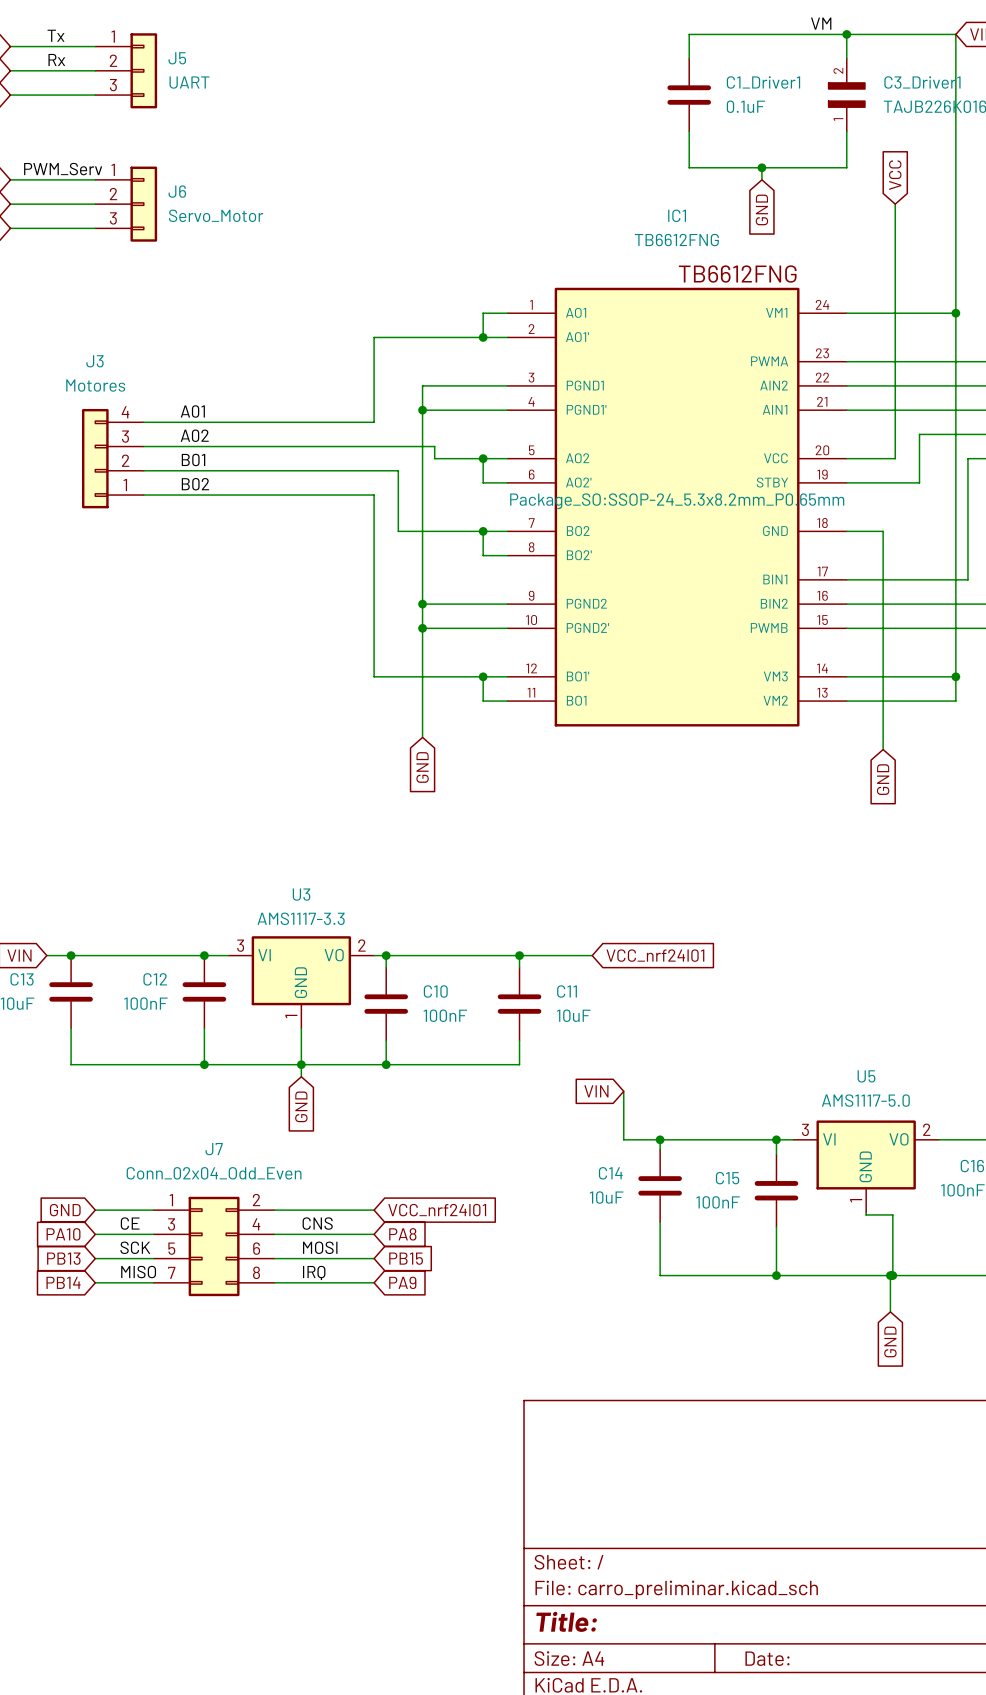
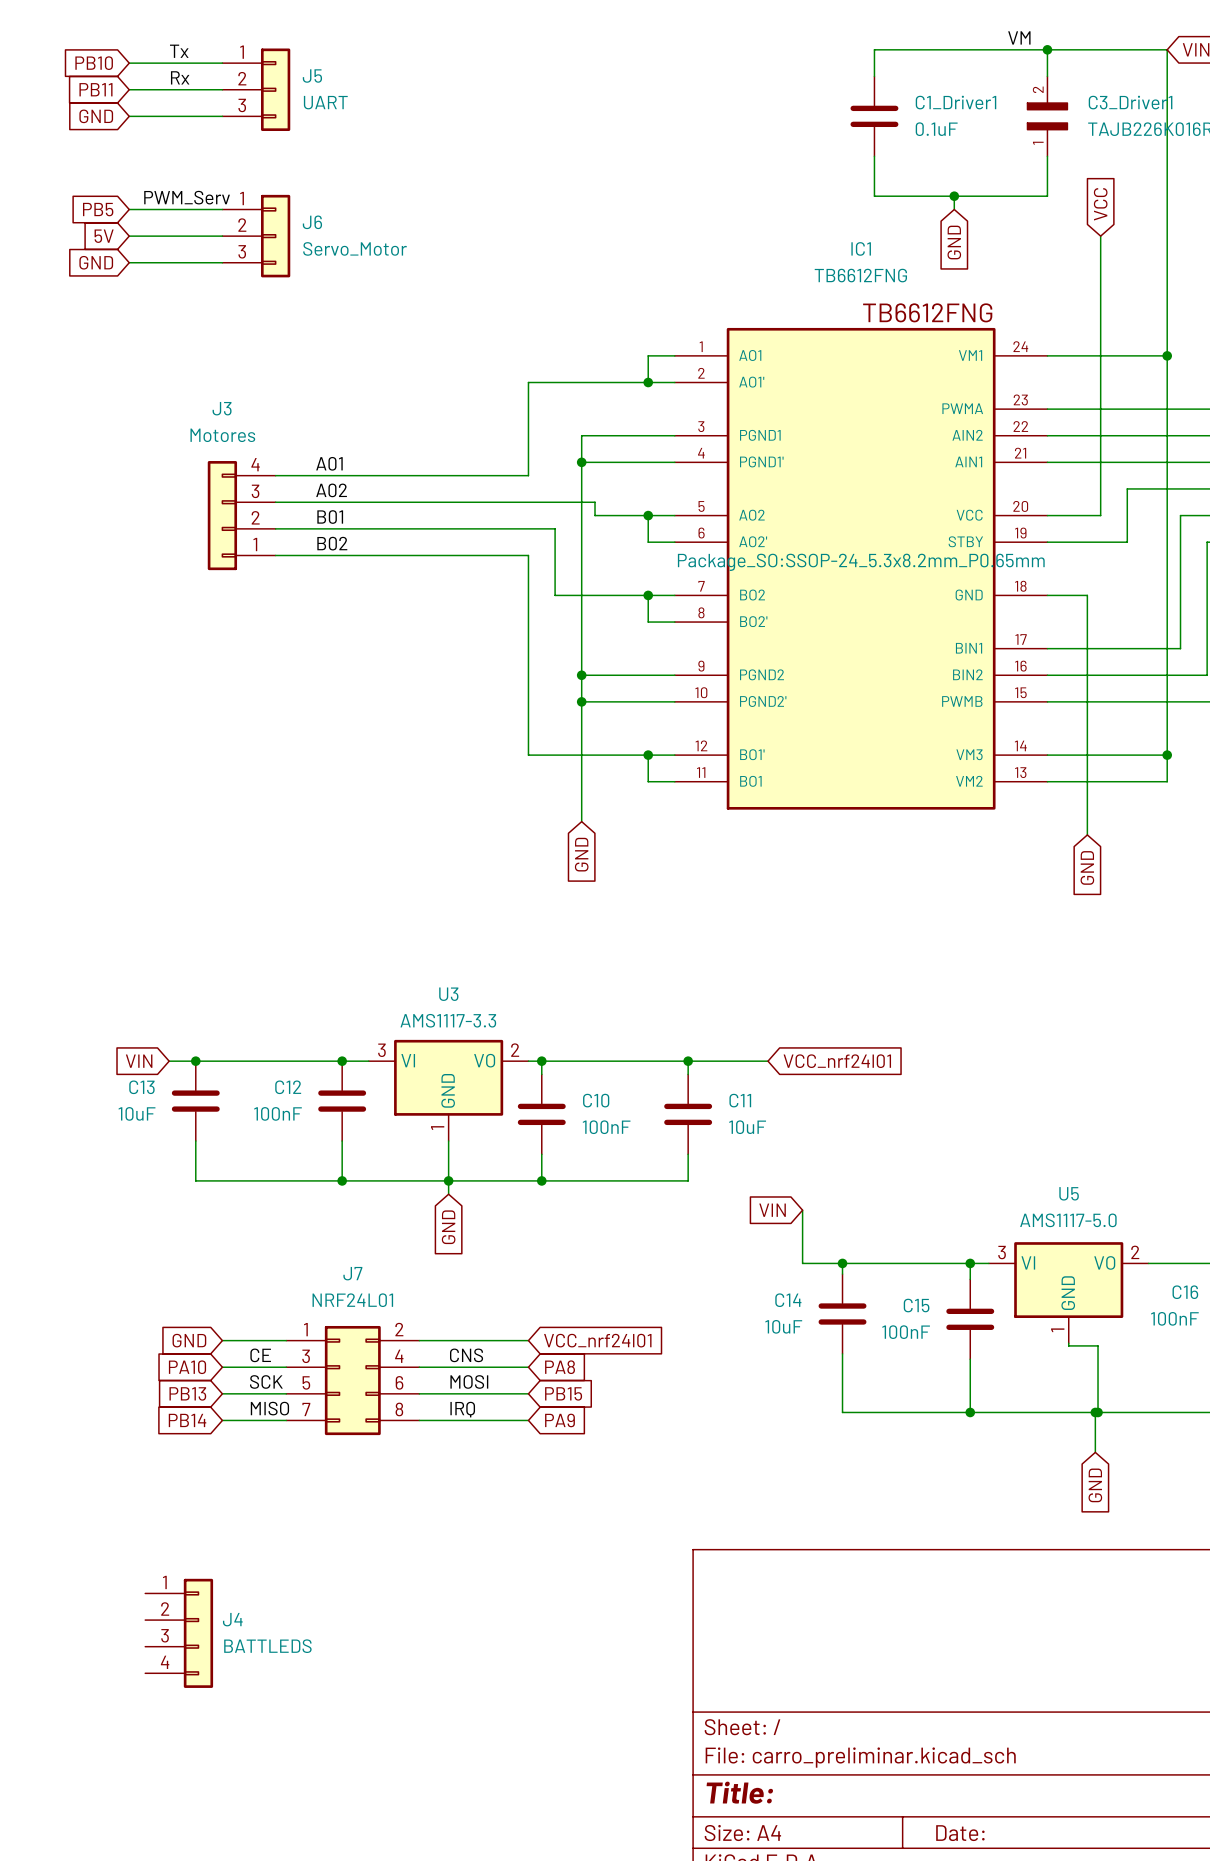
J7 value: Conn_02x04_Odd_Even (214, 1173) -> NRF24L01 (352, 1300)
J4: none -> BATTLEDS (179, 1633)

